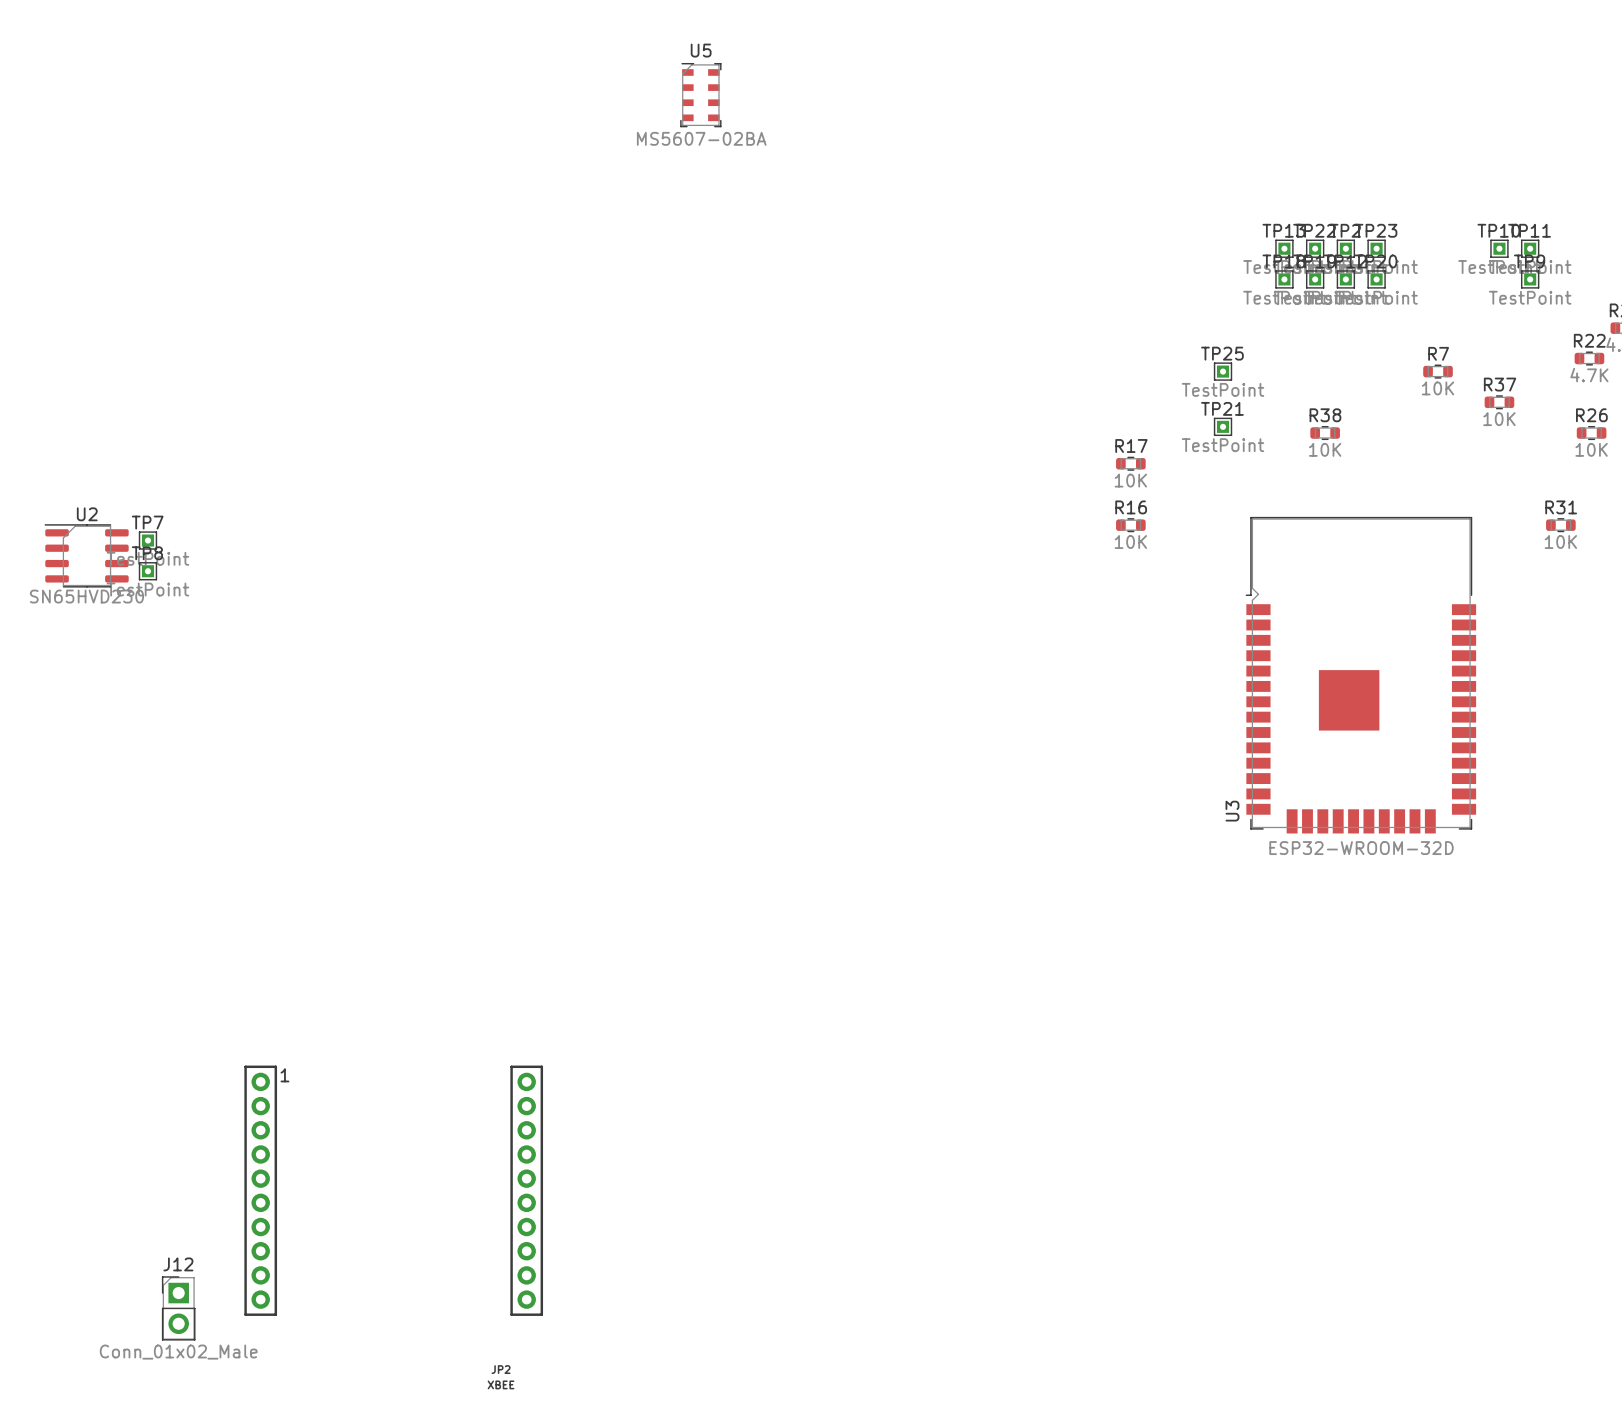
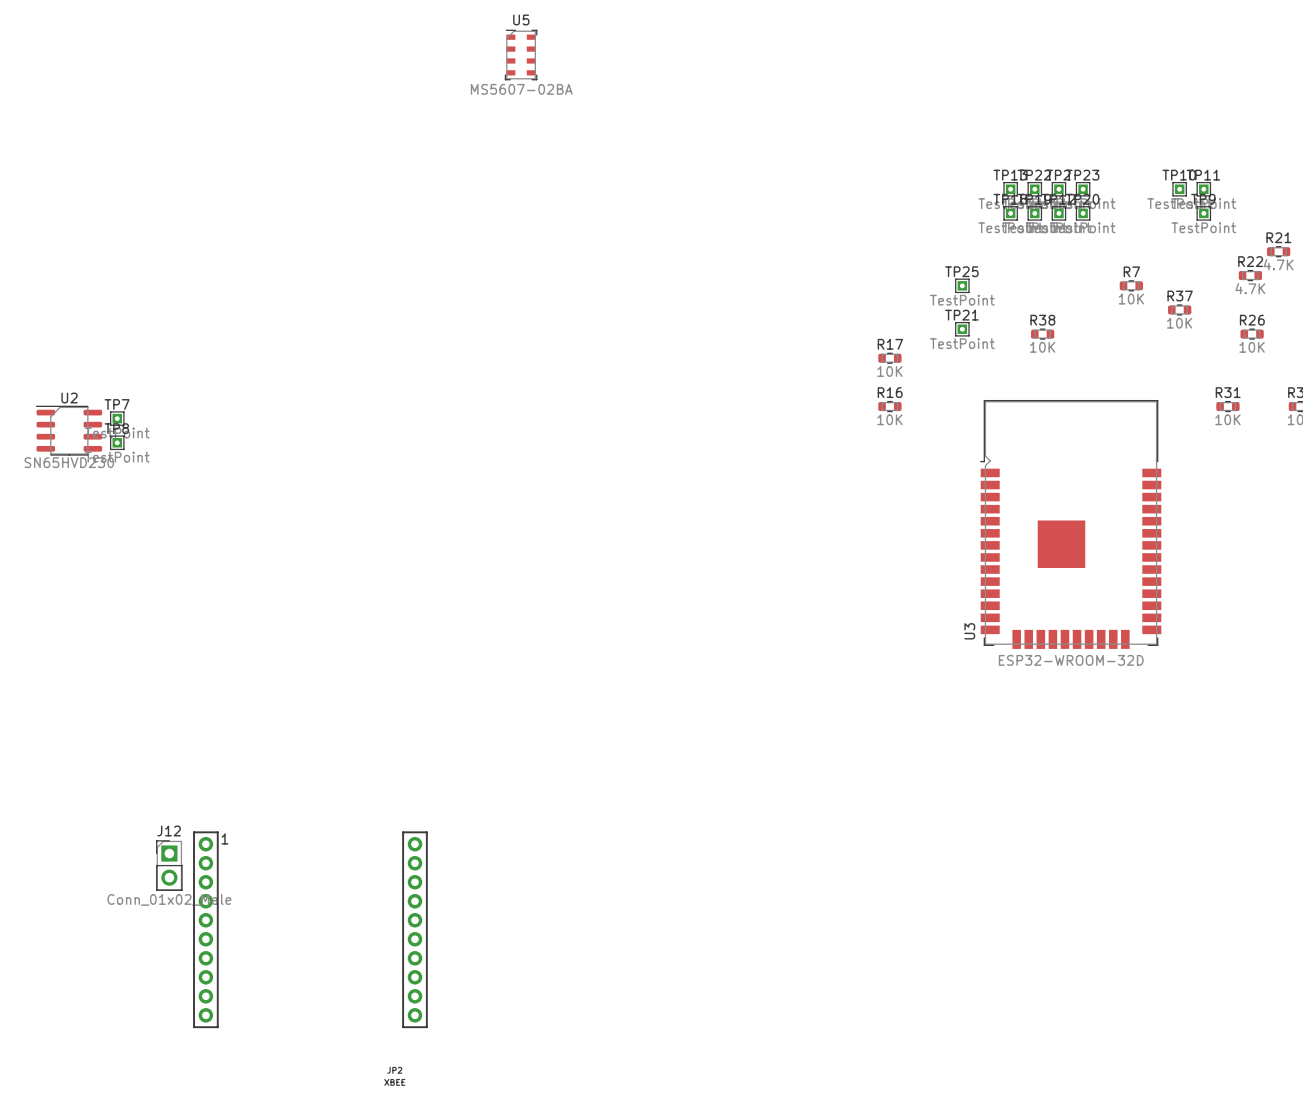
U5 position: (700, 95) -> (521, 55)
J12 position: (178, 1308) -> (169, 865)

